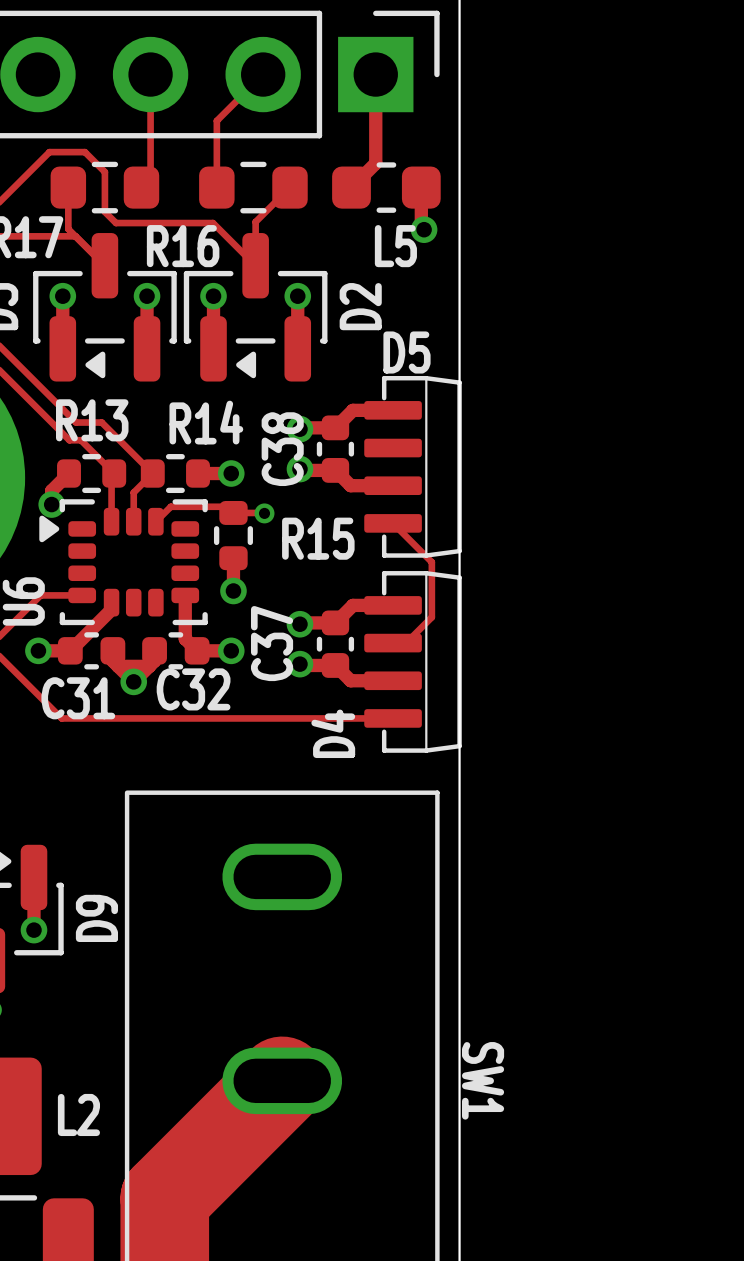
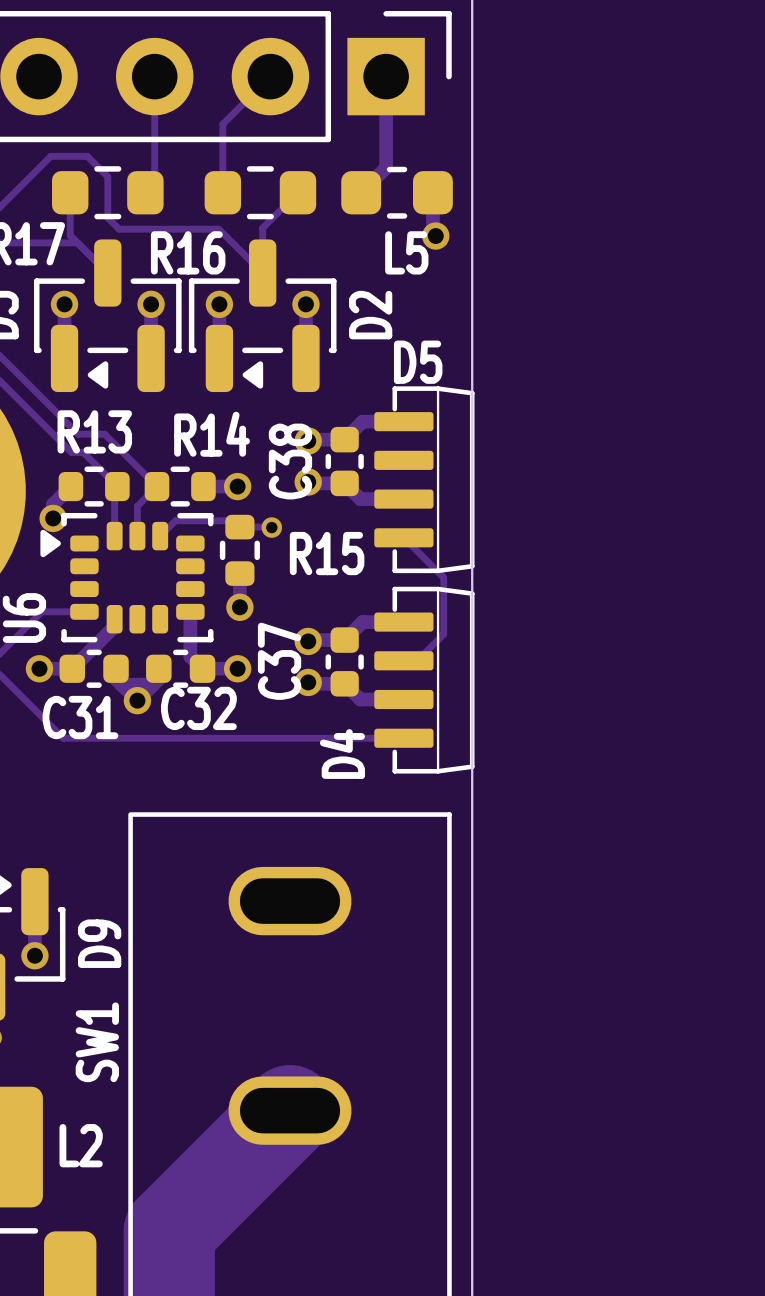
SW1 name rotation: 0° (483, 1080) -> 180° (97, 1042)
SW1 name position: SW1 (483, 1080) -> SW1 (97, 1042)

